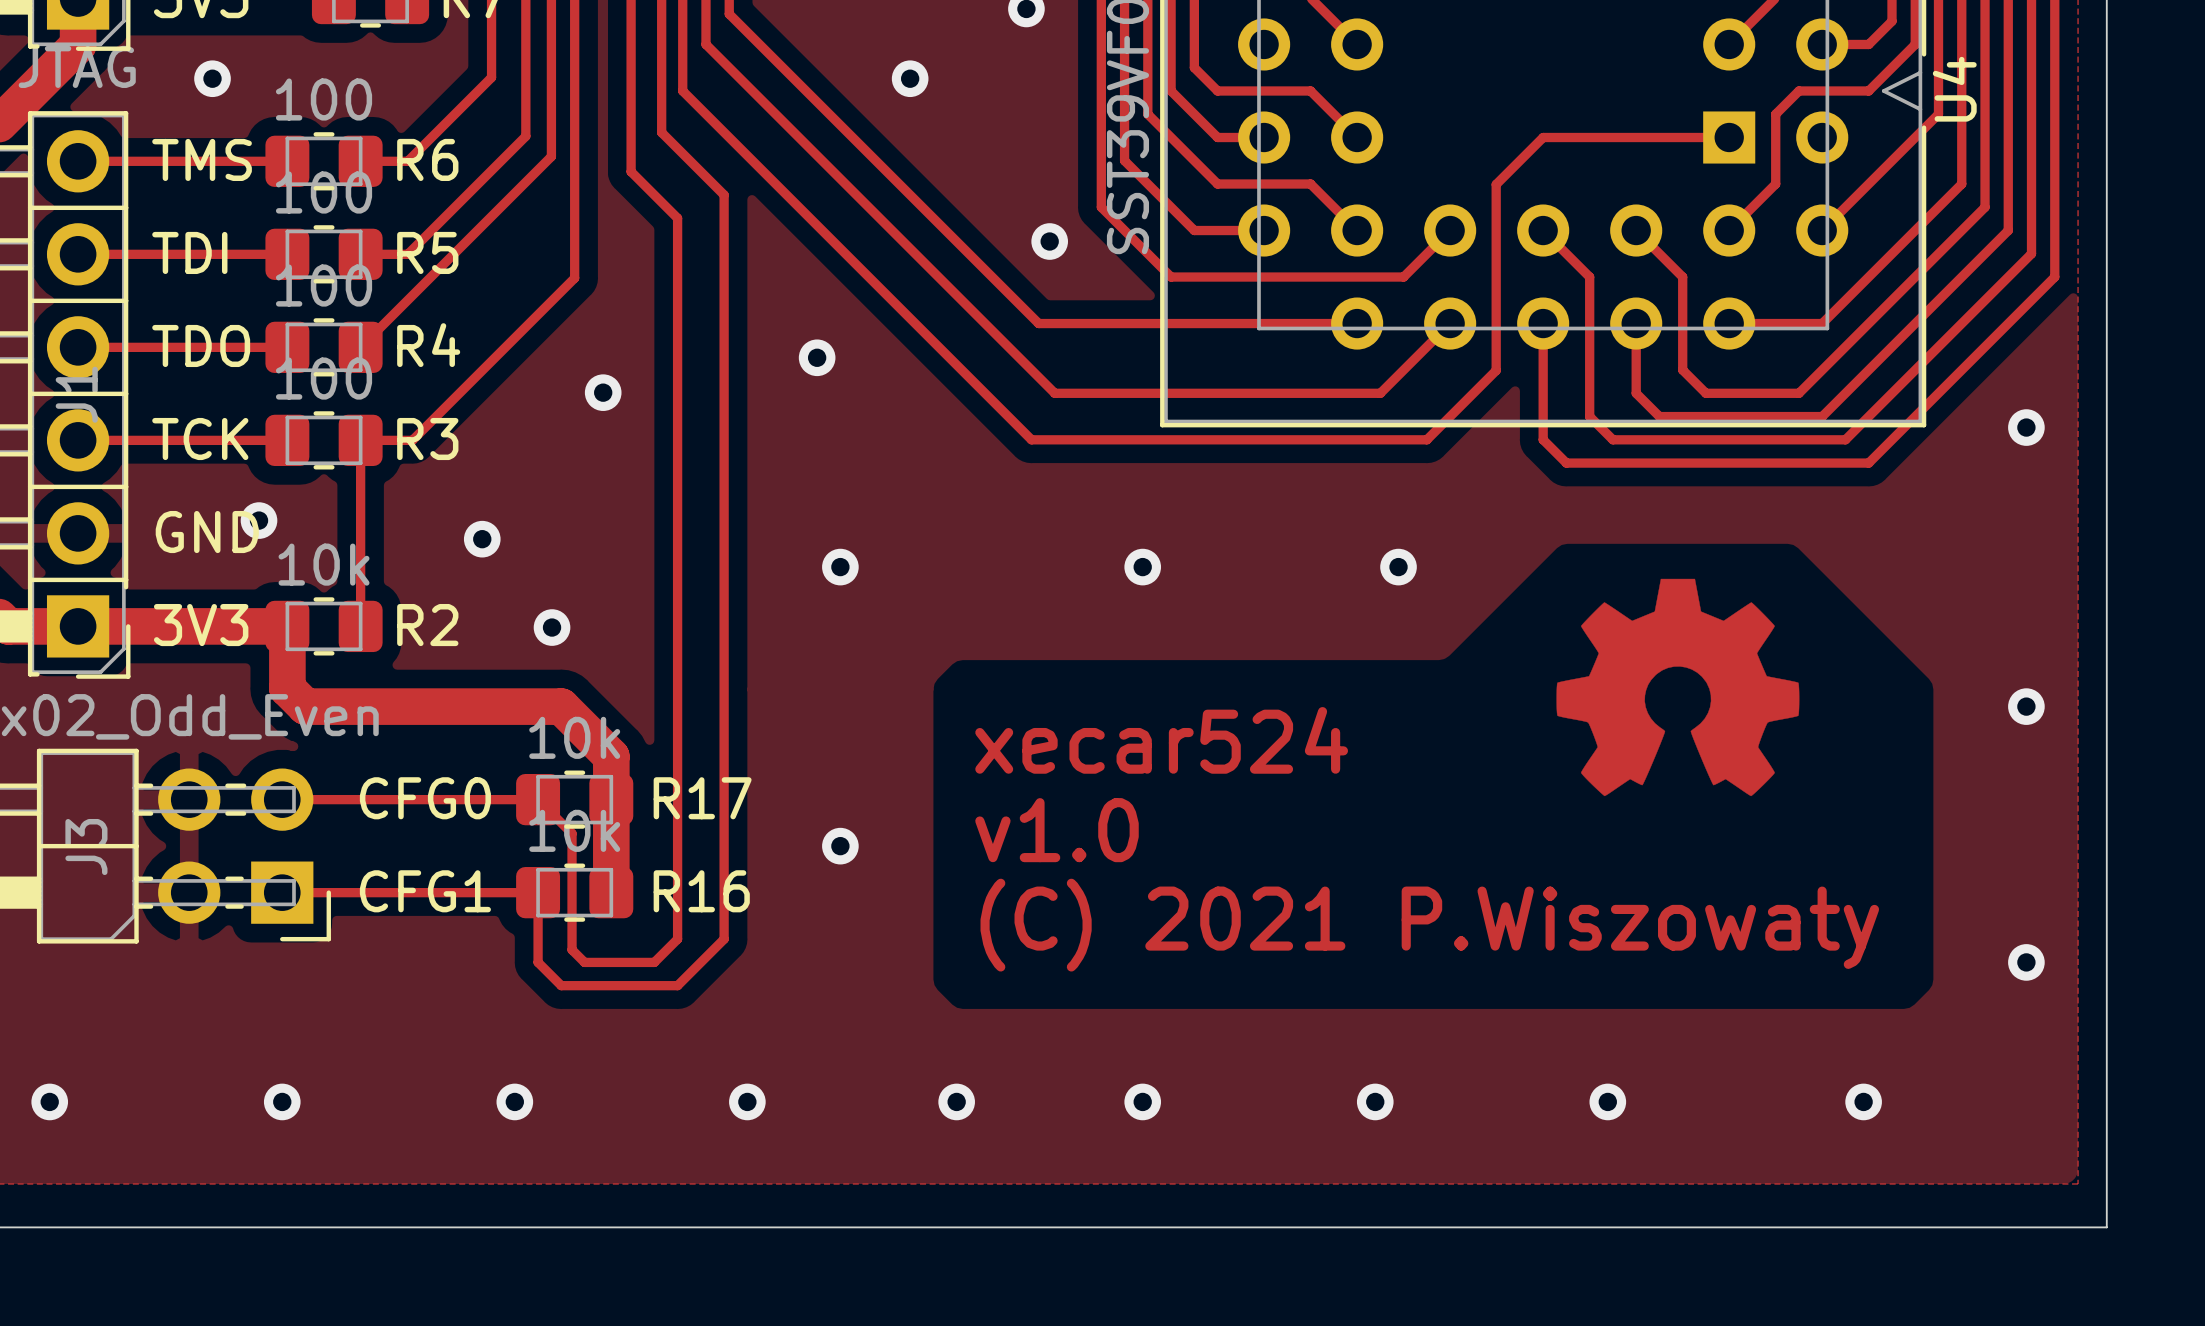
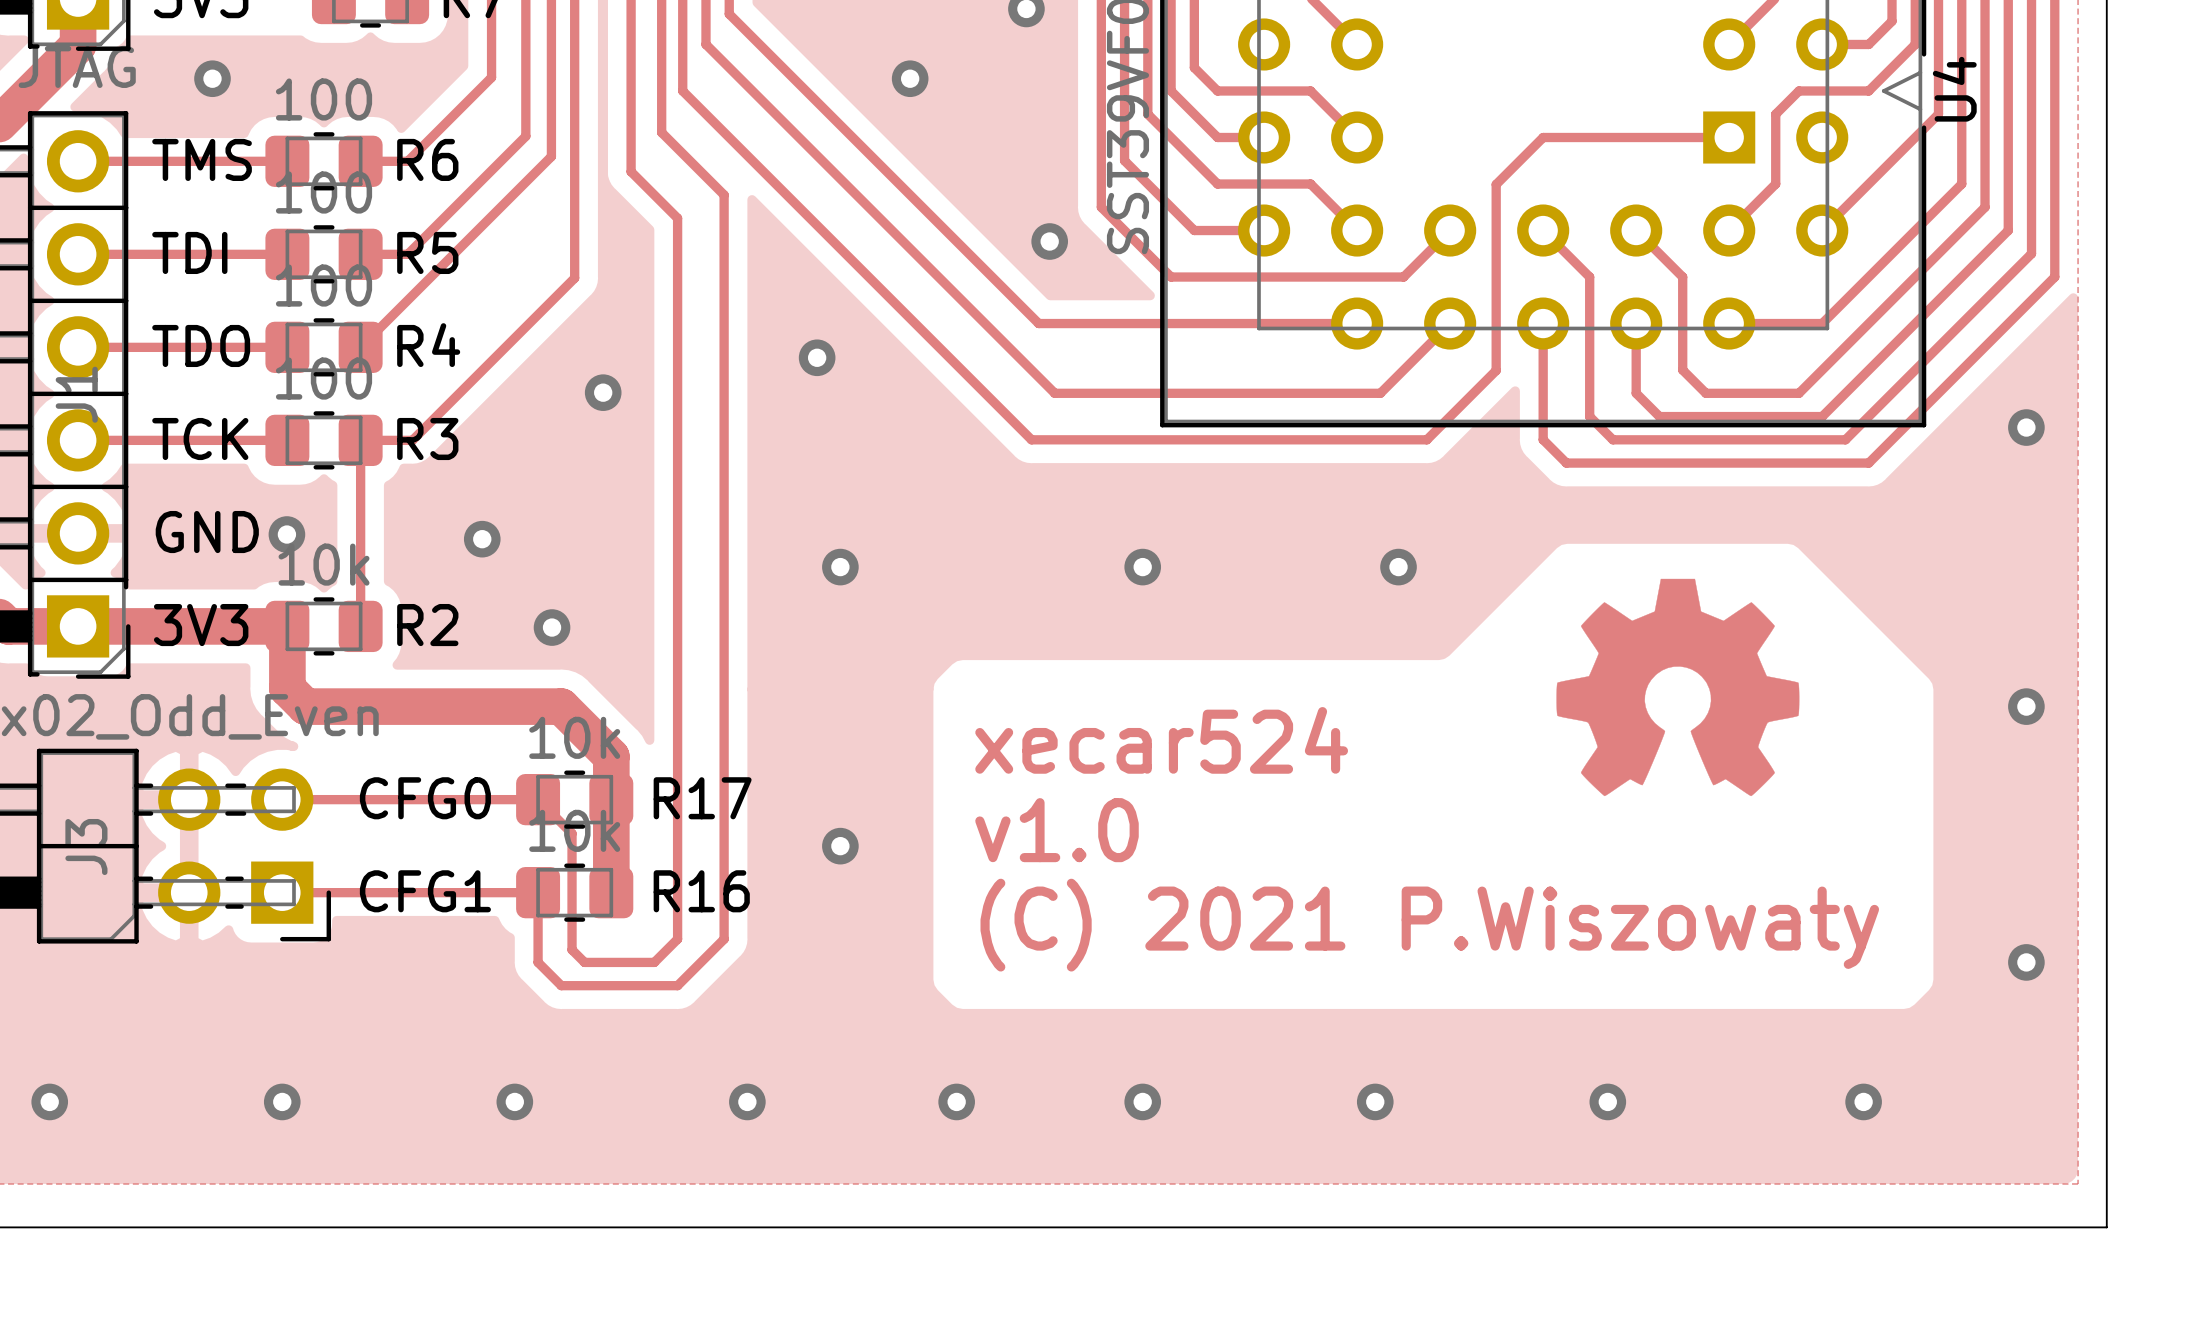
via position: (259, 520) -> (286, 534)

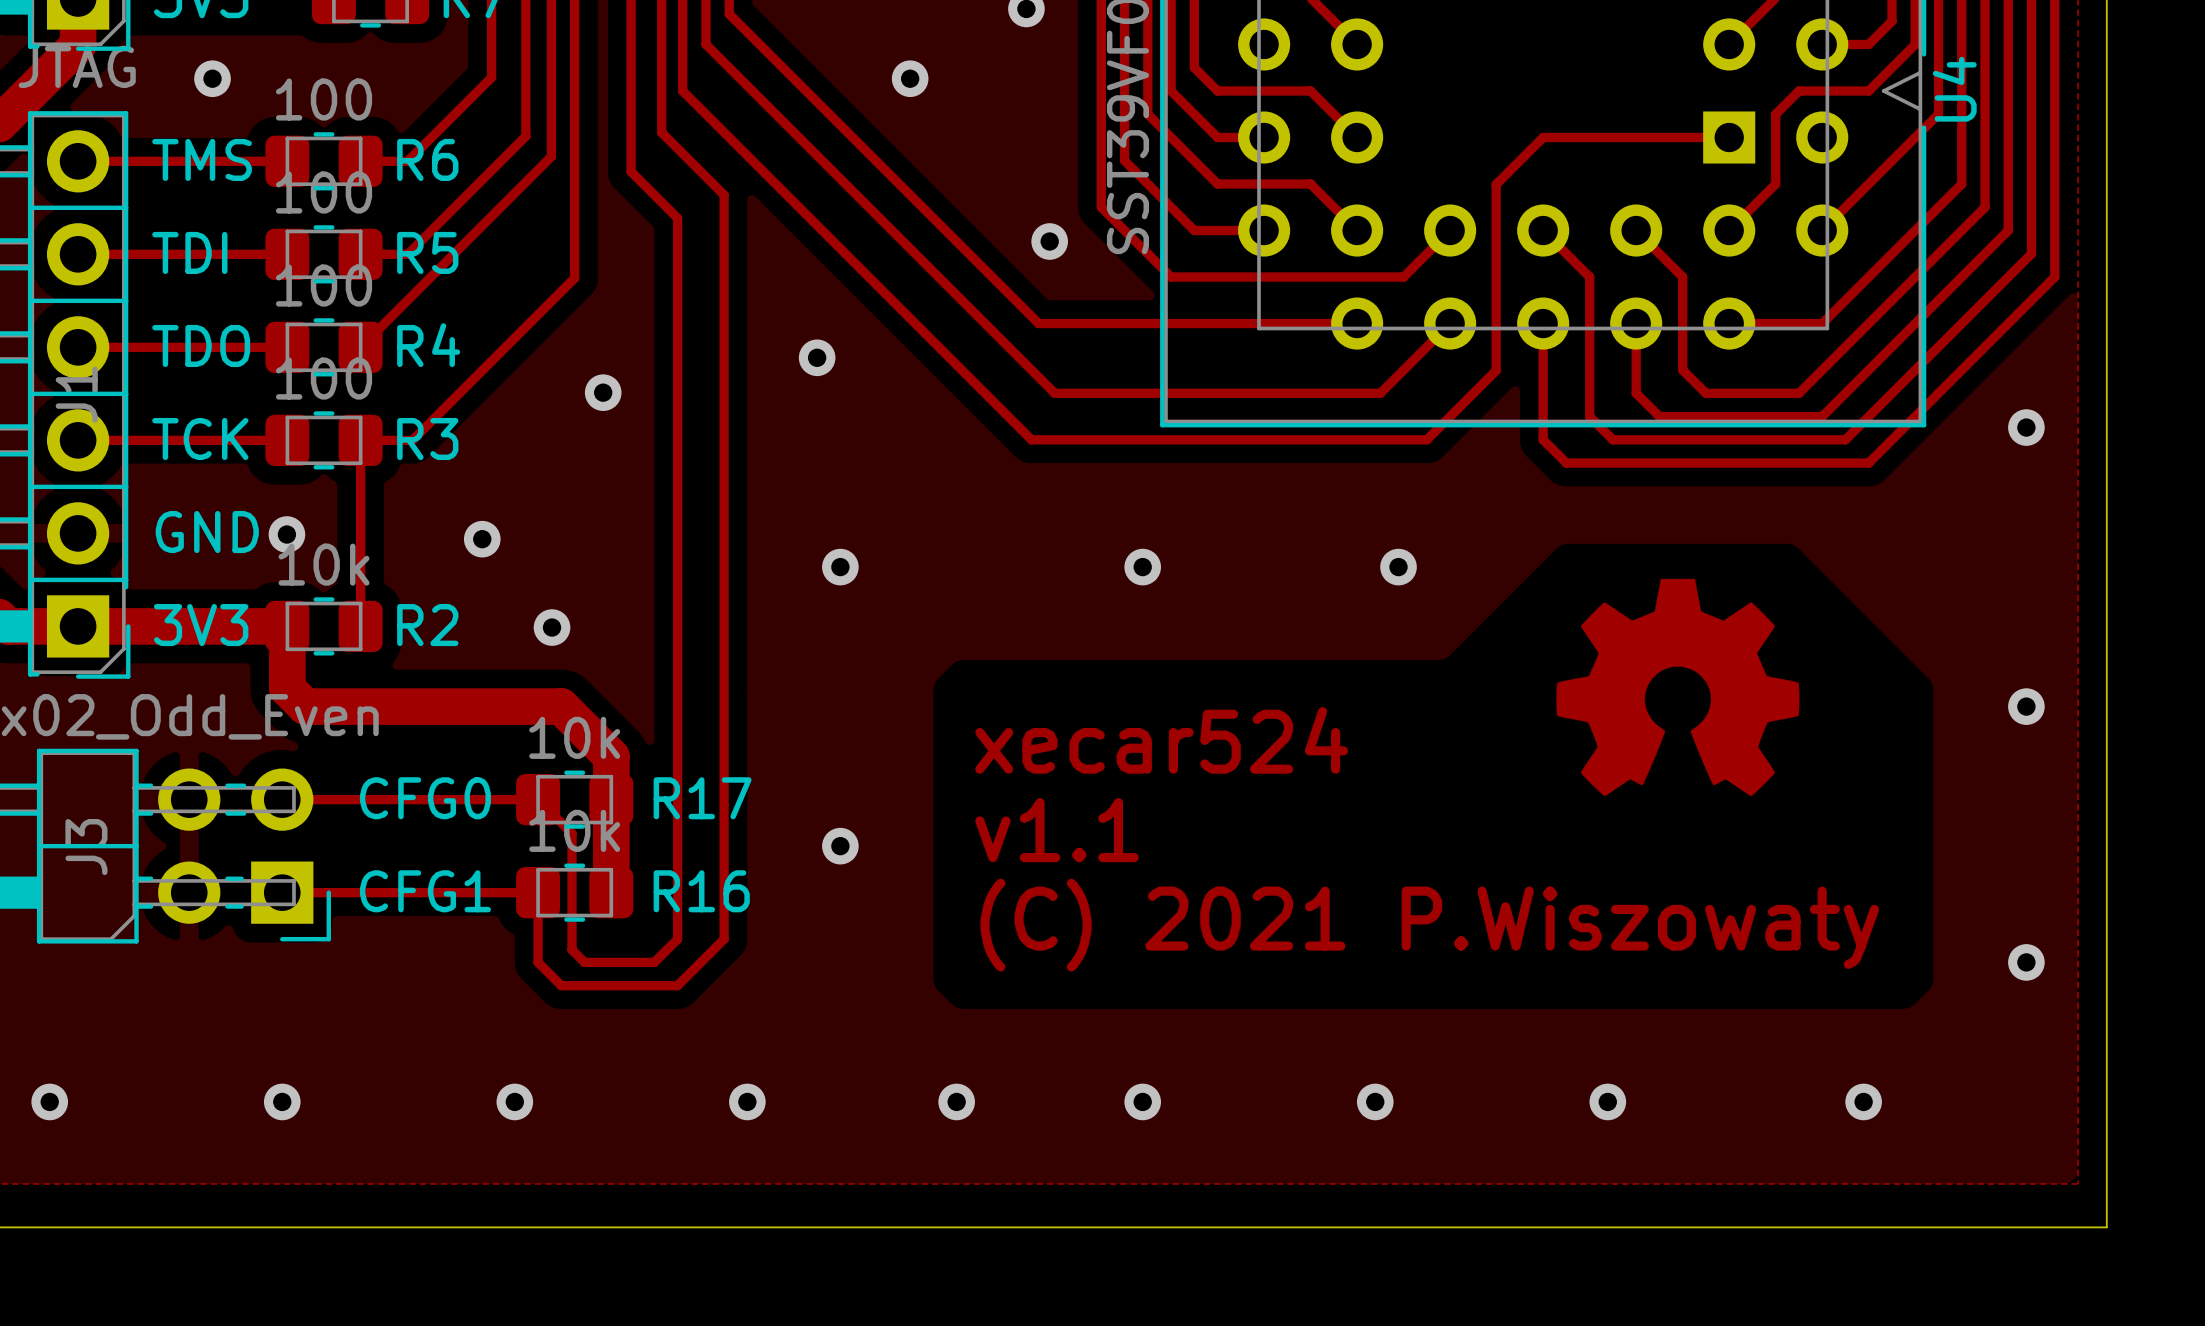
text: v1.0 (1057, 830) -> v1.1 (1057, 830)

